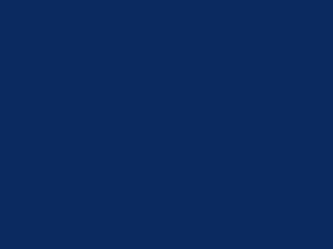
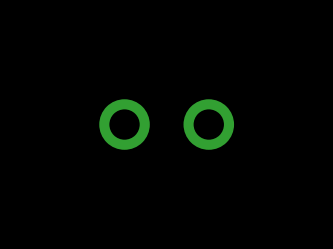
part: none -> (166, 124)

